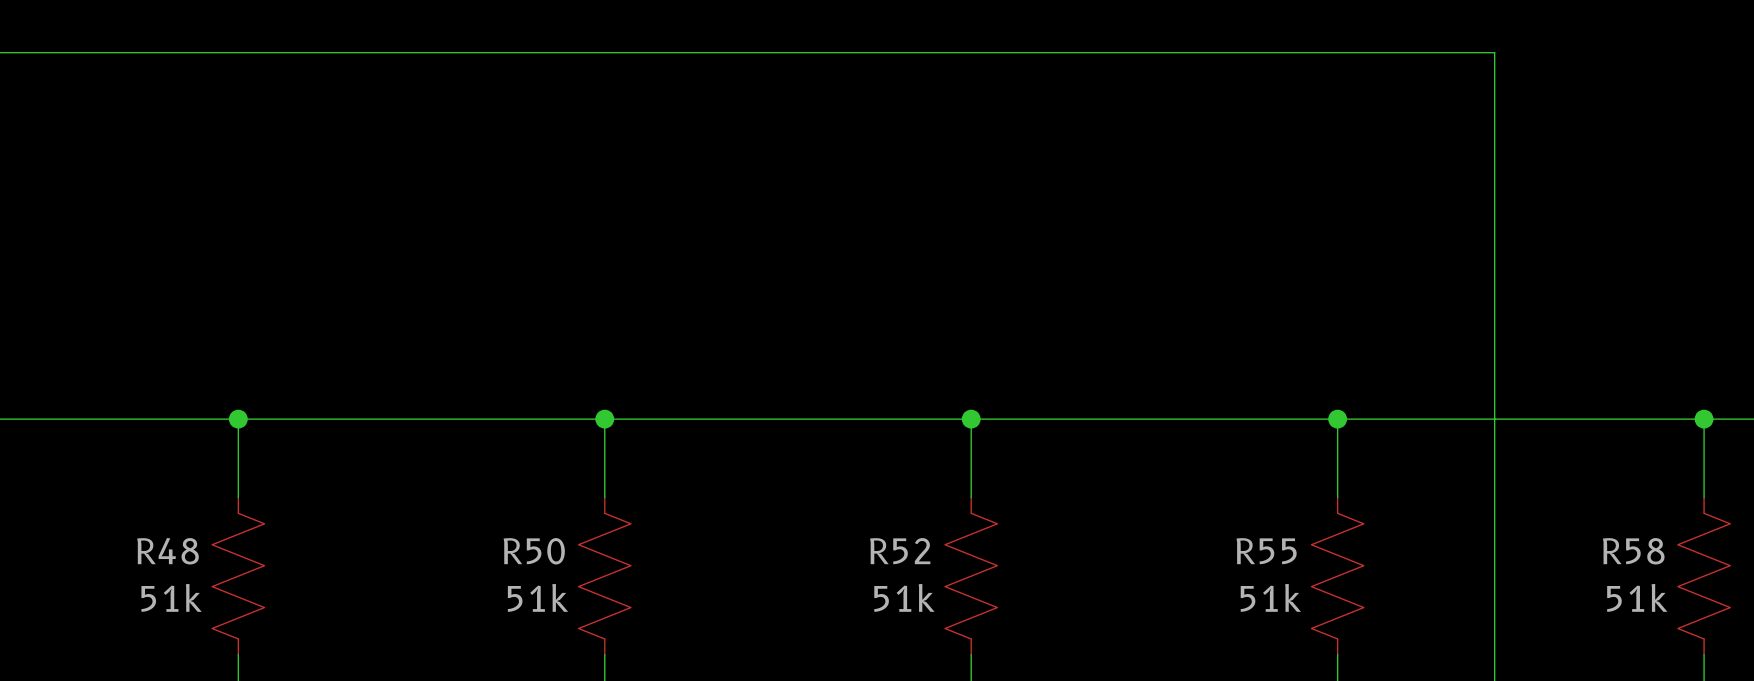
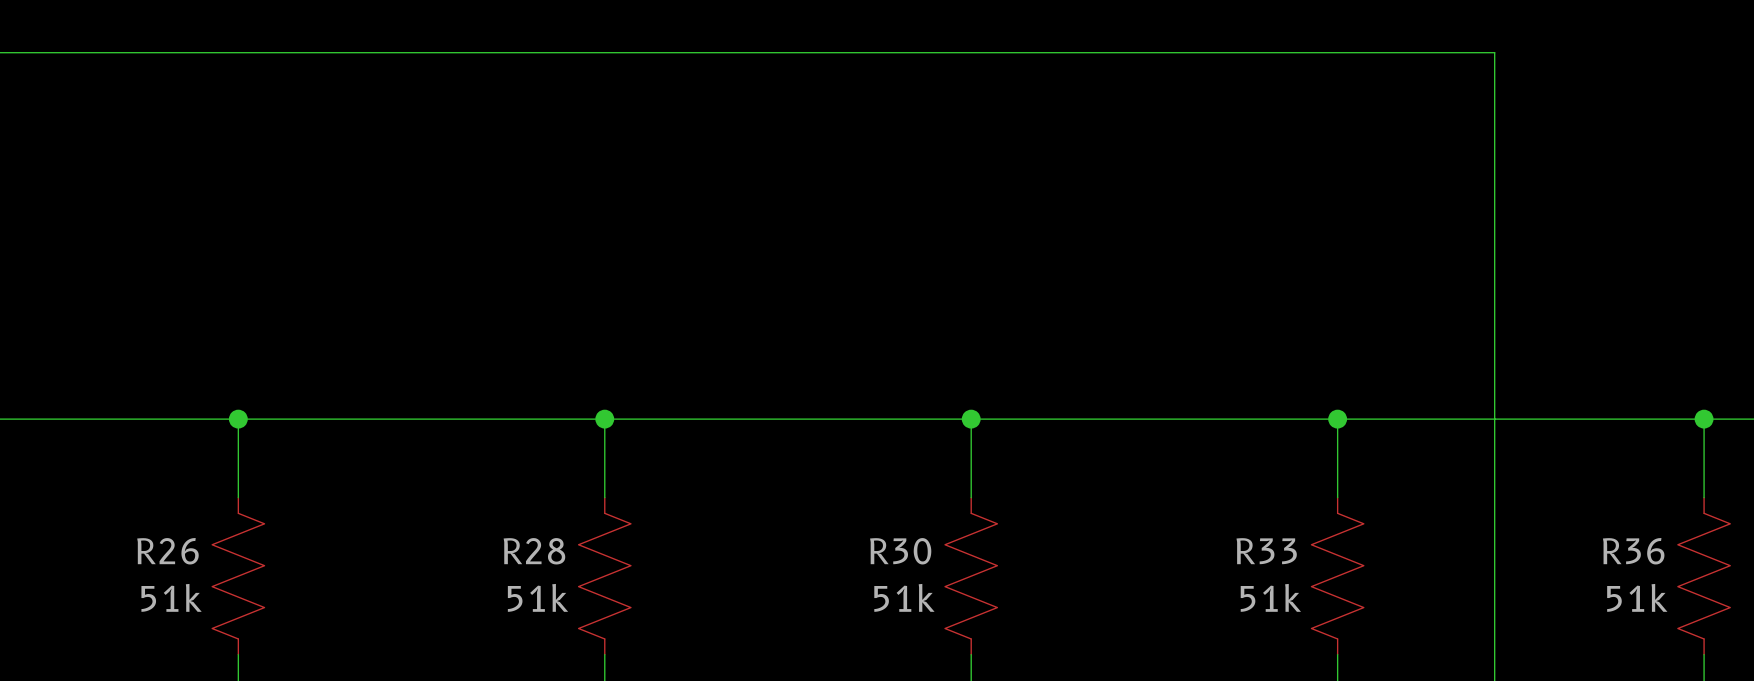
R48 name: R48 (168, 551) -> R26 (167, 551)
R50 name: R50 (534, 551) -> R28 (534, 551)
R52 name: R52 (900, 551) -> R30 (900, 551)
R55 name: R55 (1266, 551) -> R33 (1266, 551)
R58 name: R58 (1633, 551) -> R36 (1633, 551)

